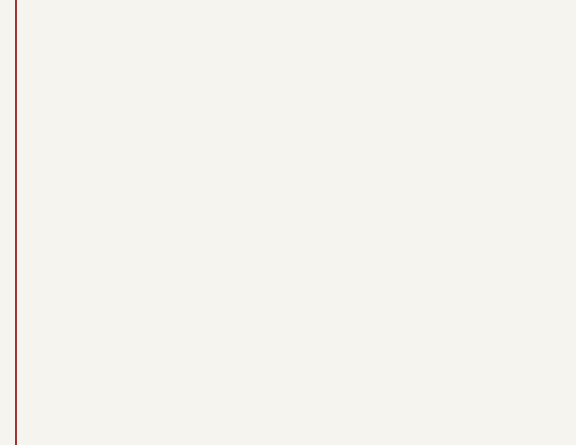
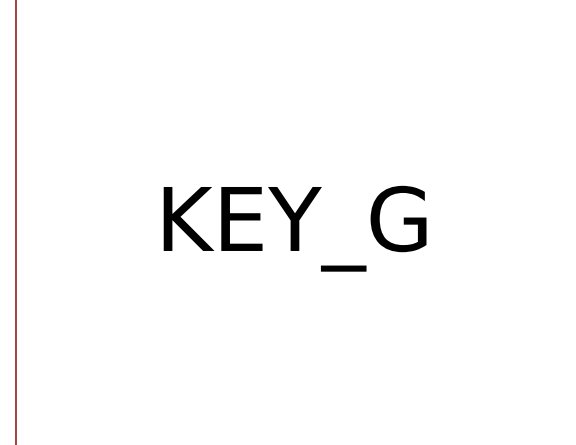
label: none -> KEY_G (295, 228)

